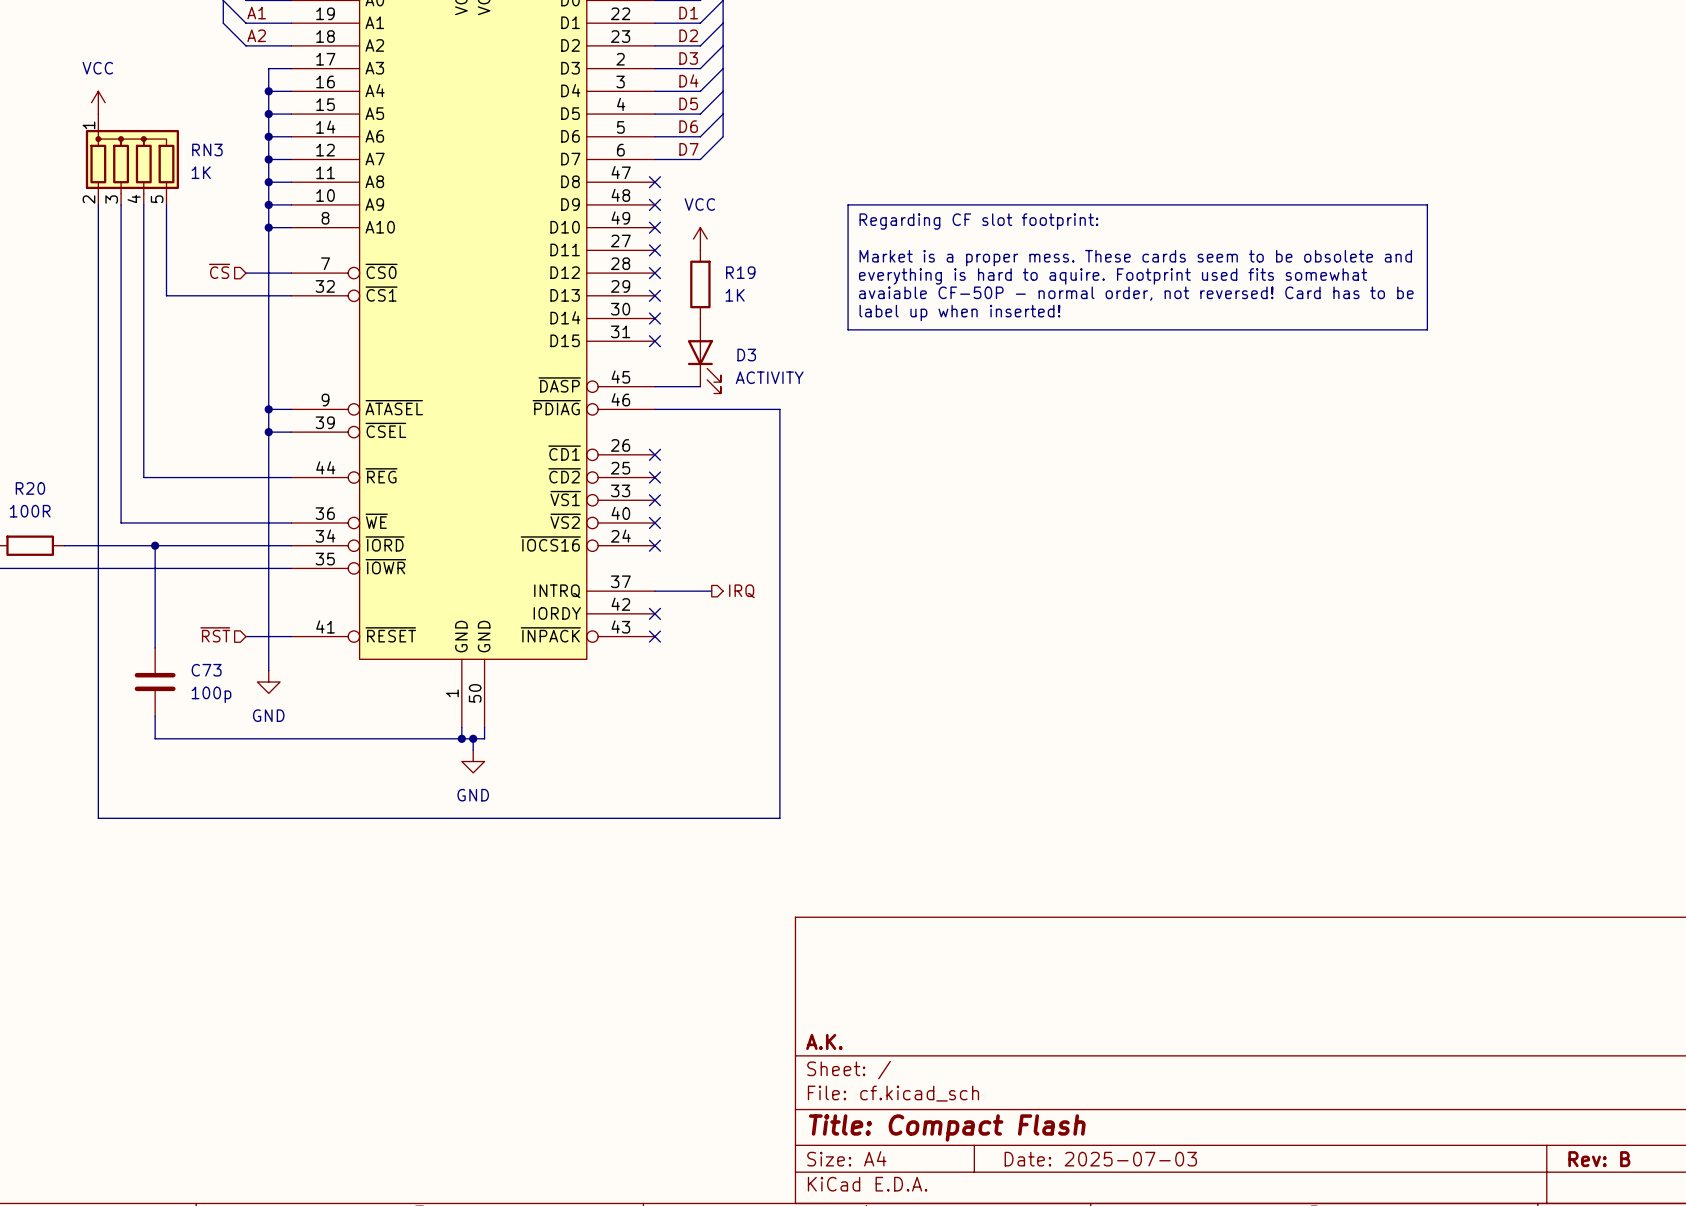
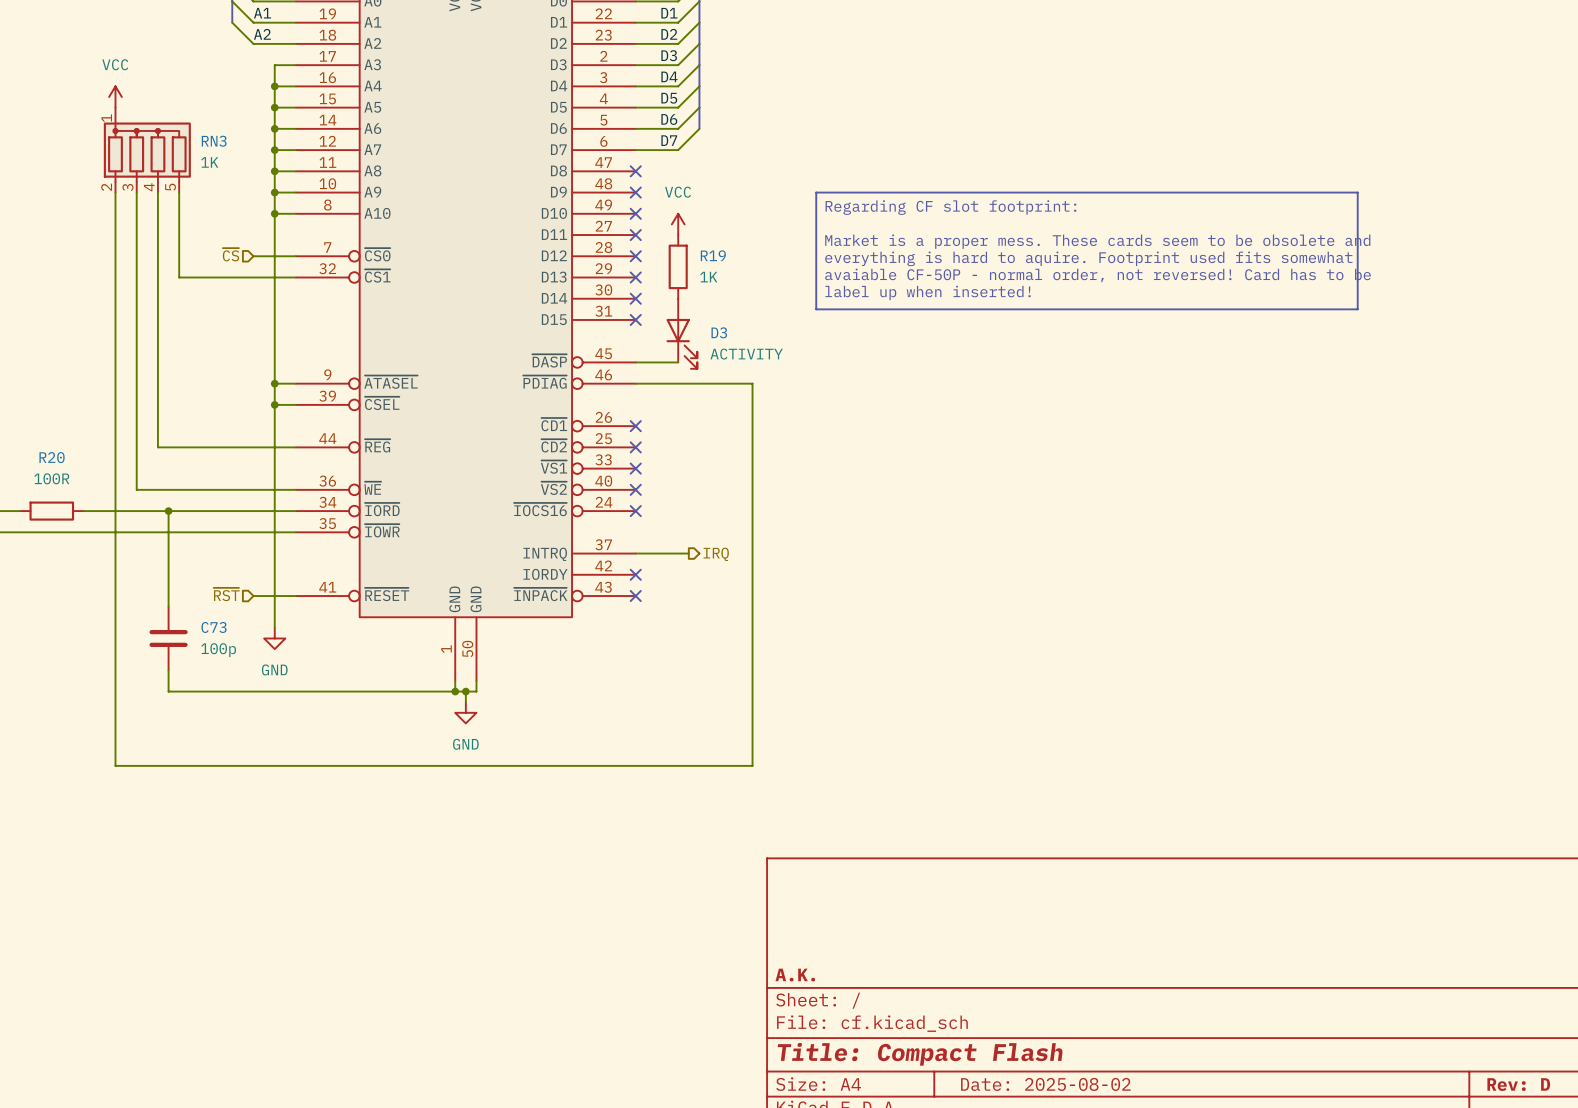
title block: Date: 2025-07-03 (1100, 1159) -> Date: 2025-08-02 (1045, 1084)
title block: Rev: B (1599, 1159) -> Rev: D (1518, 1084)

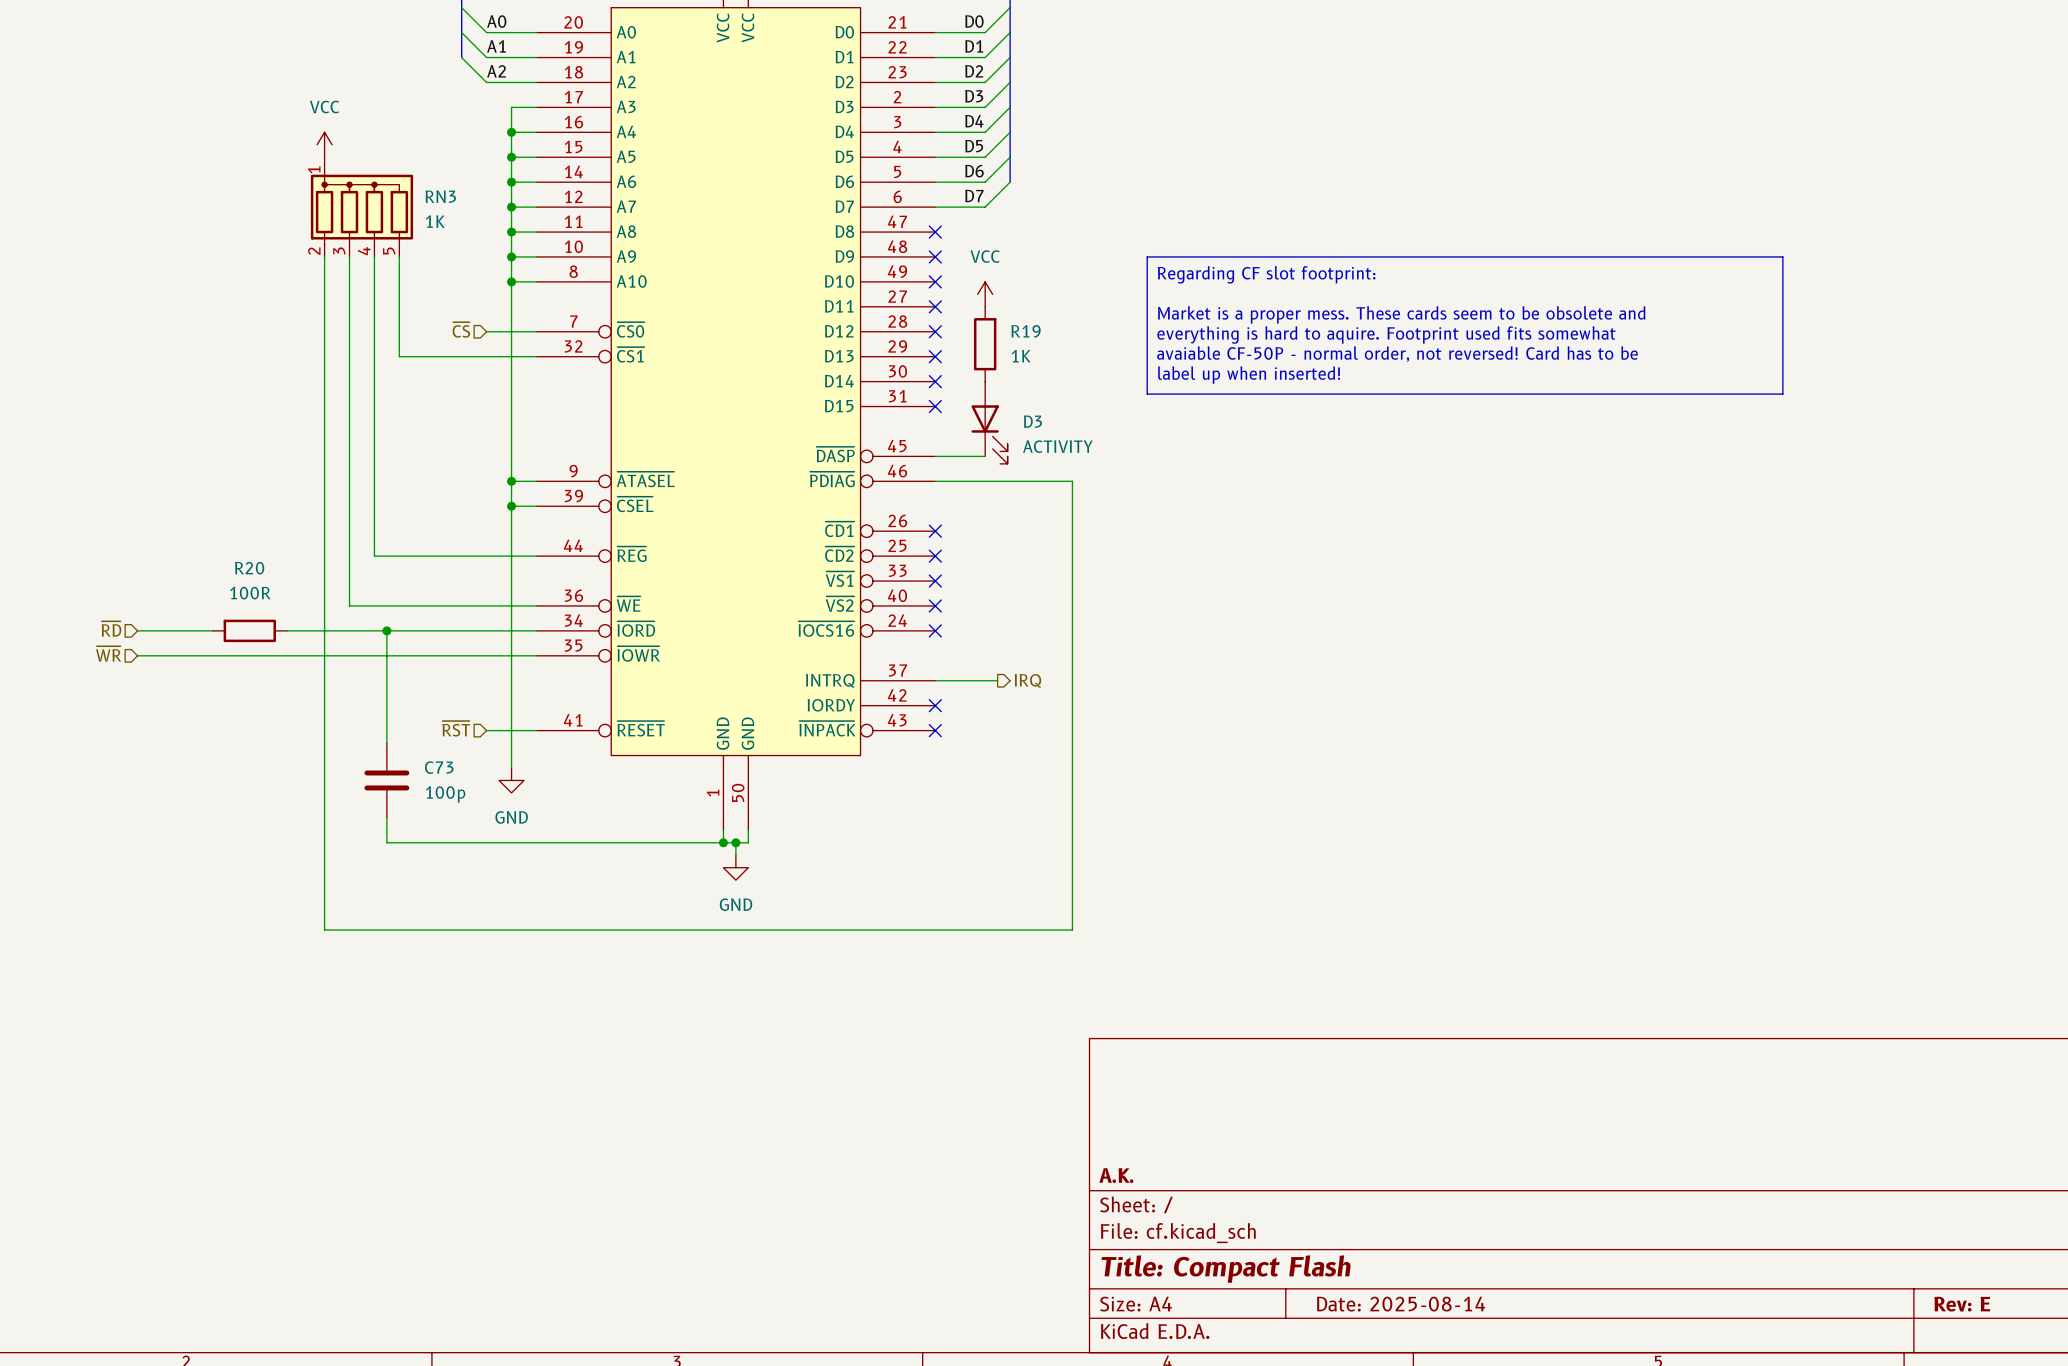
title block: Date: 2025-08-02 (1045, 1084) -> Date: 2025-08-14 (1401, 1304)
title block: Rev: D (1518, 1084) -> Rev: E (1962, 1304)

